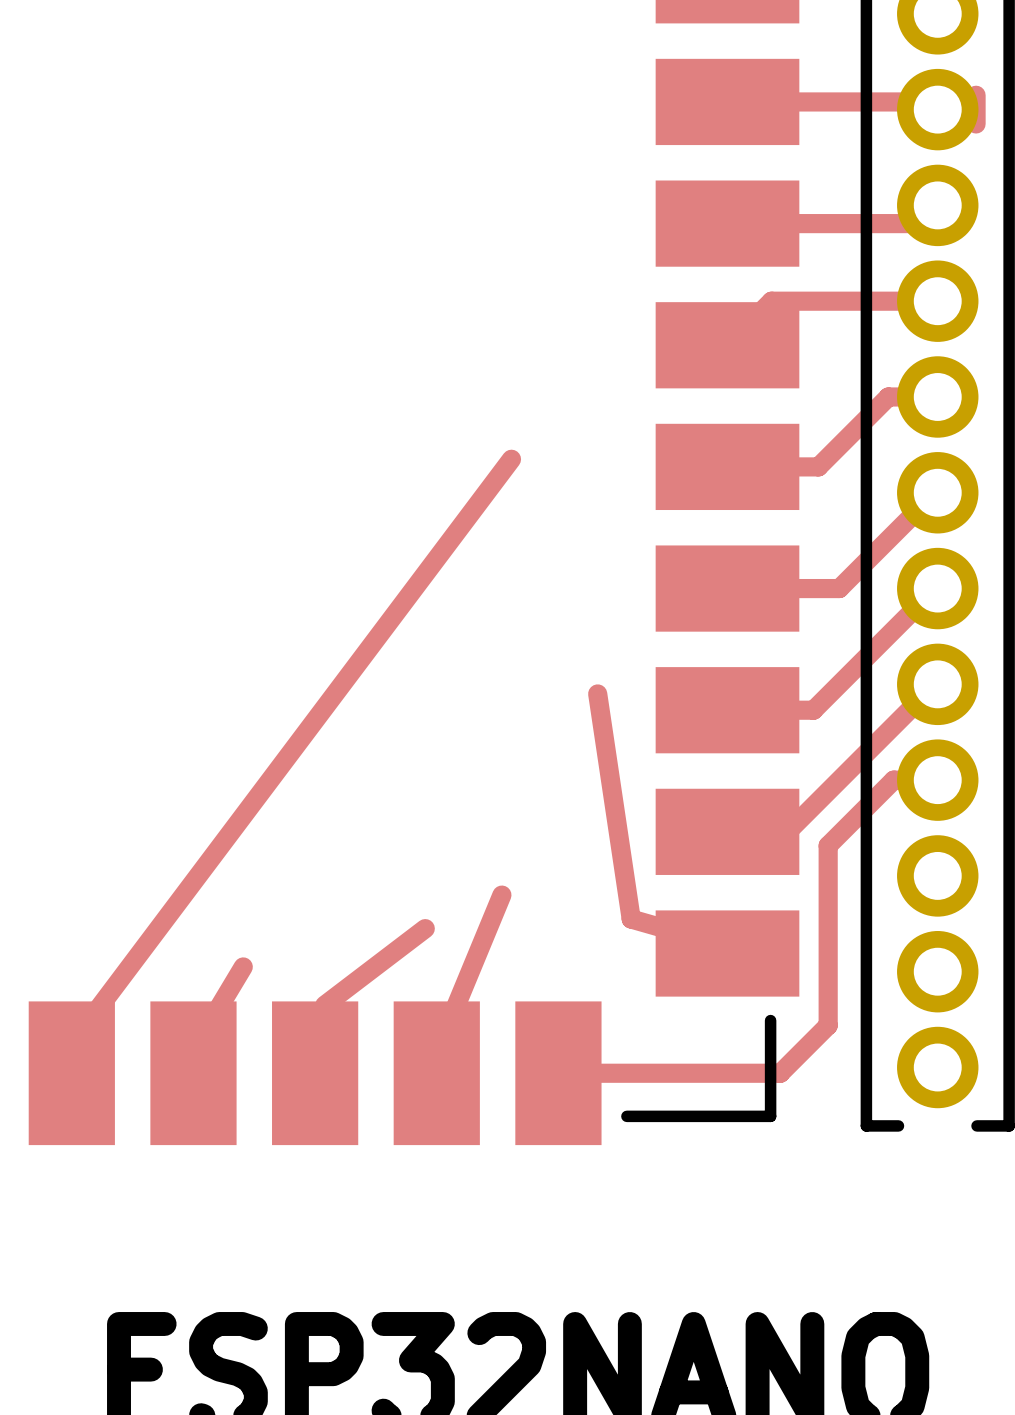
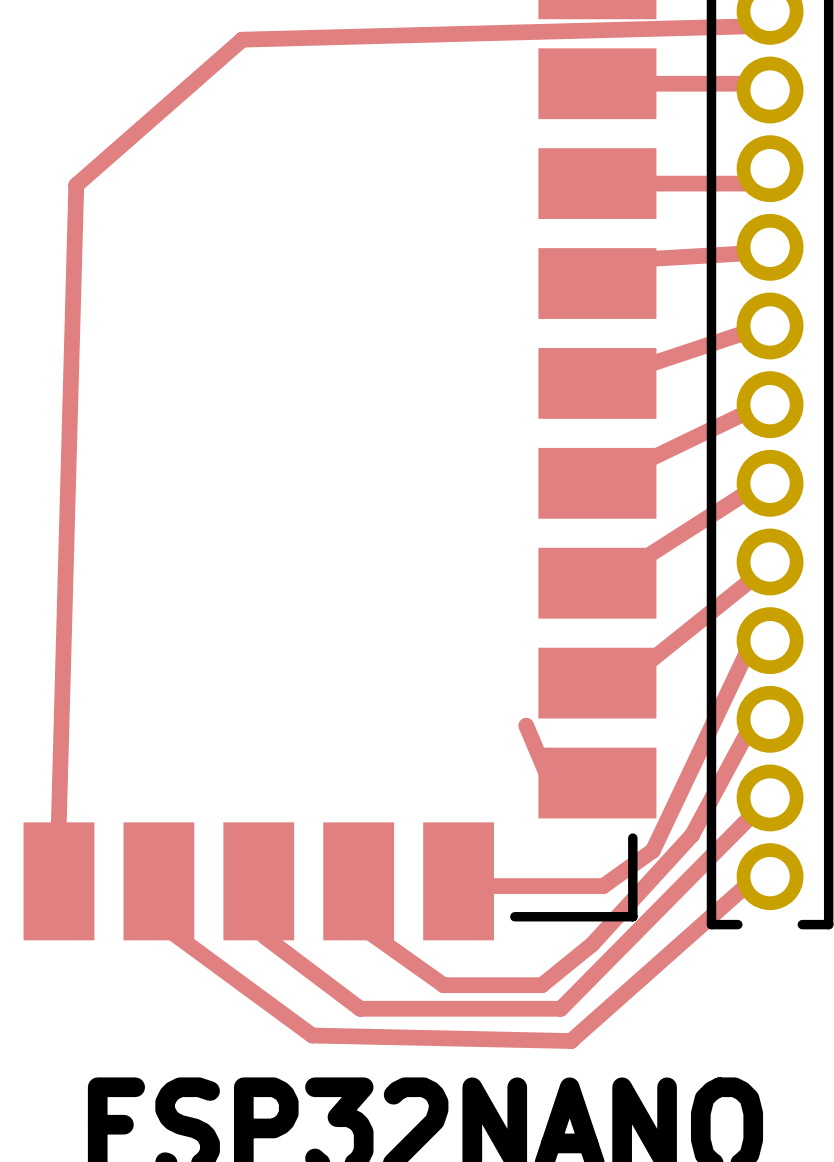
track: none -> (751, 26) (242, 39) (76, 185) (57, 875)
track: (976, 95) (976, 123) -> none
track: (937, 301) (771, 301) (727, 345) -> none
track: none -> (741, 253) (646, 259)
track: (937, 396) (888, 396) (818, 466) (727, 466) -> none
track: none -> (741, 333) (632, 370)
track: (511, 459) (90, 1019) -> none
track: (935, 492) (839, 588) (727, 588) -> none
track: none -> (741, 414) (635, 466)
track: (935, 588) (813, 710) (727, 710) -> none
track: none -> (741, 495) (645, 557)
track: (935, 684) (787, 831) -> none
track: (597, 693) (631, 919) (698, 938) -> none
track: none -> (751, 579) (648, 662)
track: (937, 780) (893, 780) (828, 845) (828, 1025) (780, 1073) (558, 1073) -> none
track: none -> (746, 653) (652, 850) (603, 886) (476, 886)
track: none -> (526, 725) (547, 775)
track: none -> (746, 734) (692, 834) (592, 944) (541, 985) (443, 985) (364, 929)
track: (501, 895) (444, 1033) -> none
track: (425, 928) (324, 1005) -> none
track: (243, 966) (200, 1038) -> none
track: none -> (750, 816) (560, 1008) (360, 1008) (264, 936)
track: none -> (744, 886) (571, 1041) (312, 1035) (169, 930)

